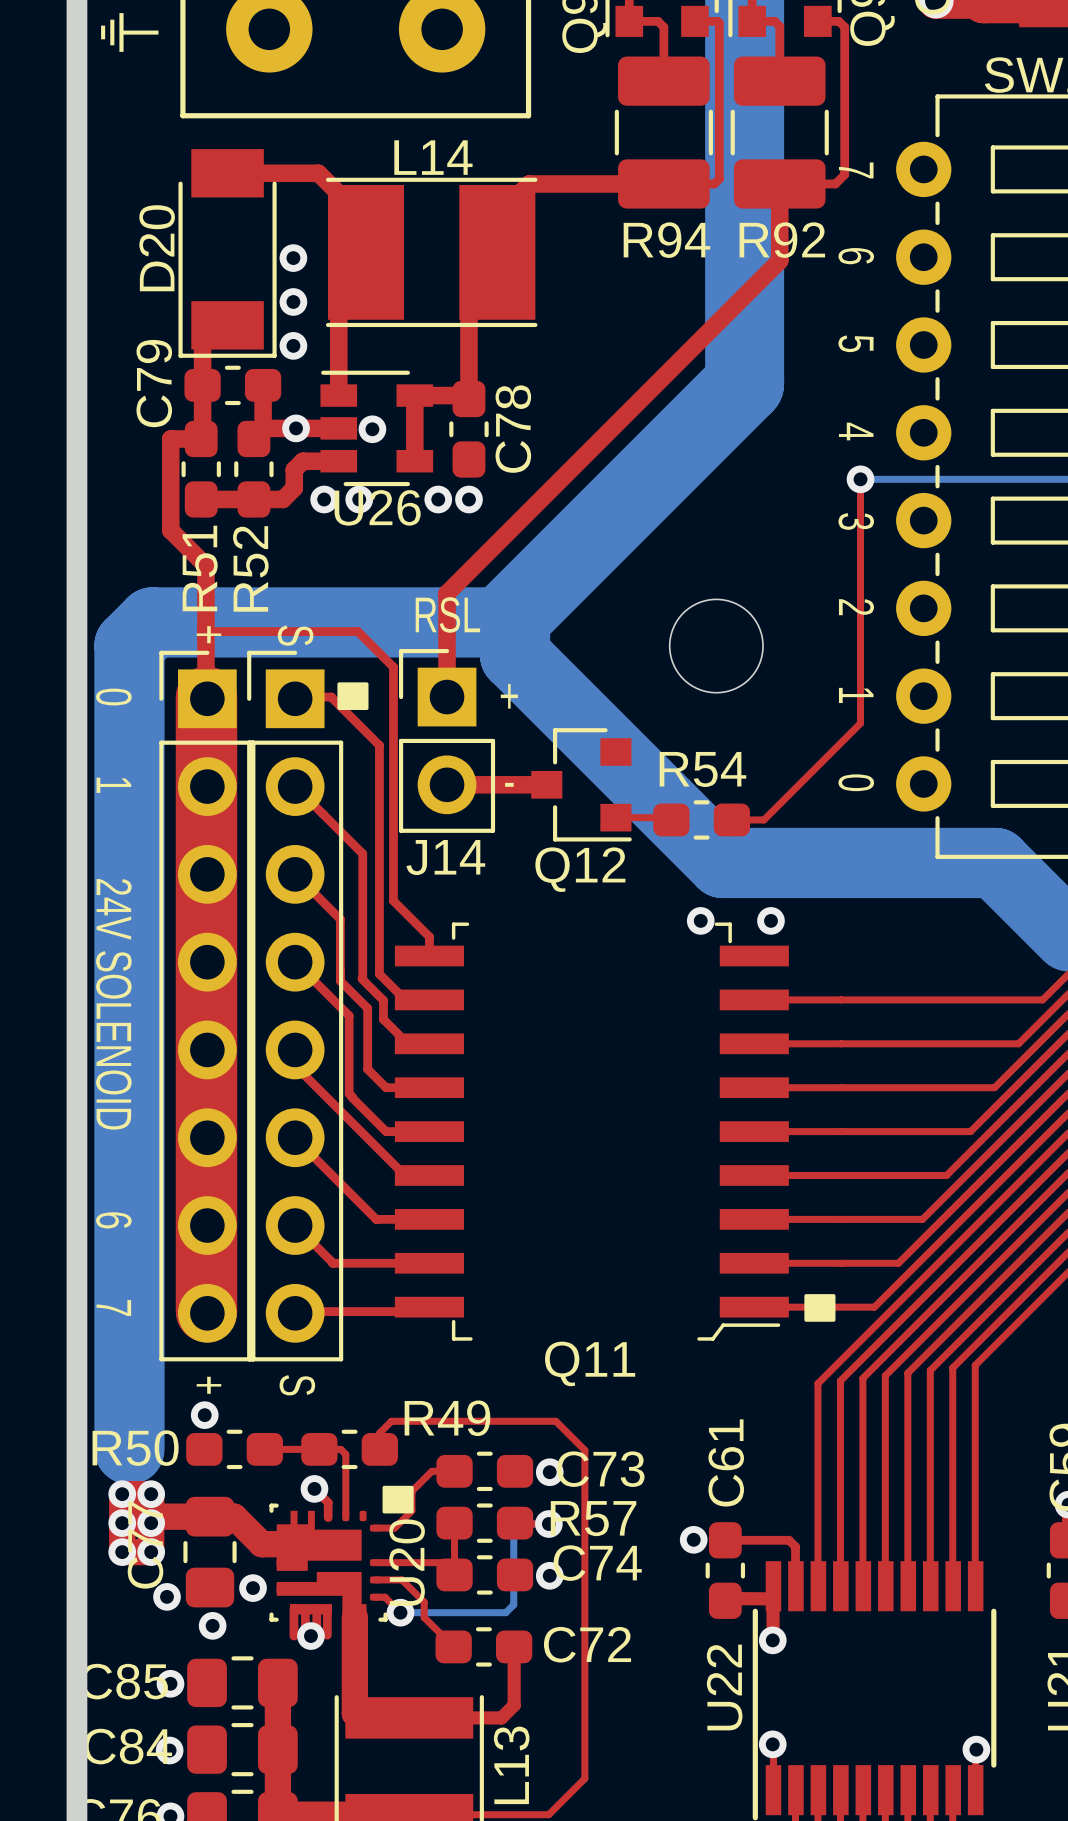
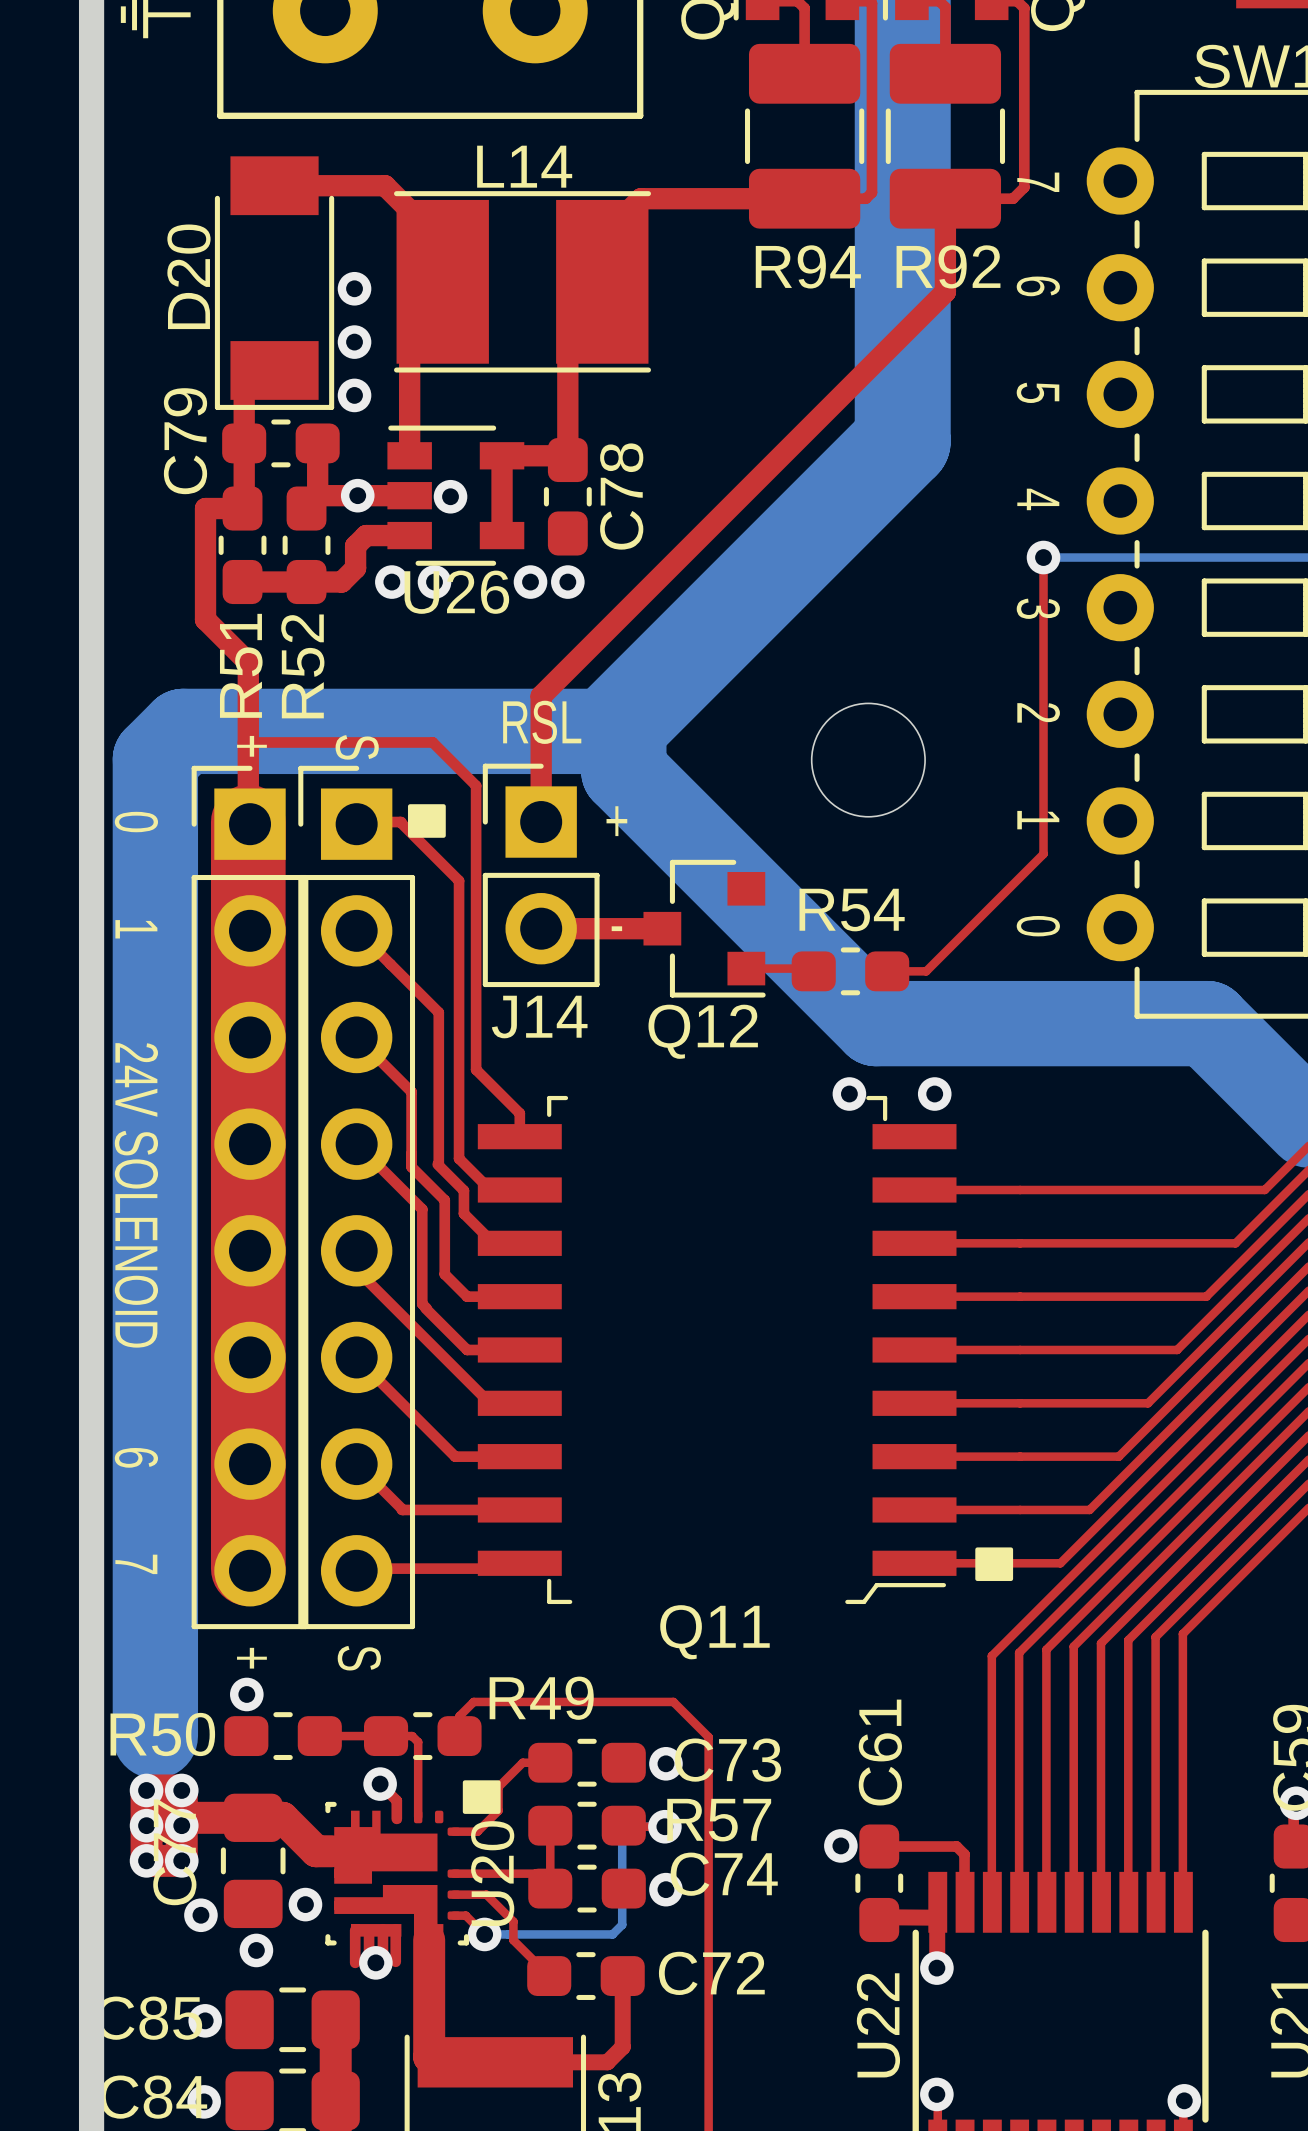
top track: (206, 697) (206, 1311) -> (248, 800) (248, 1568)

